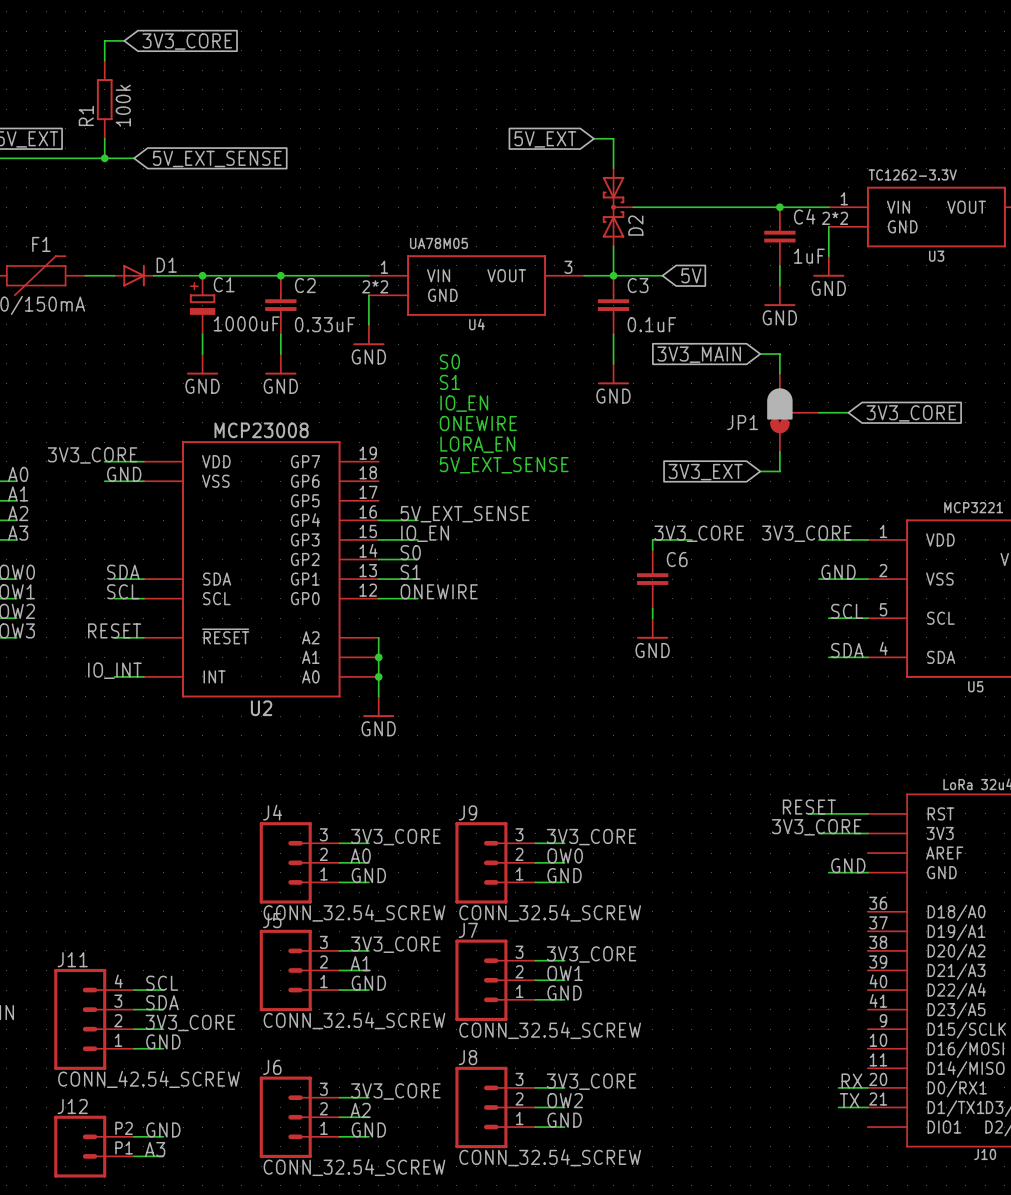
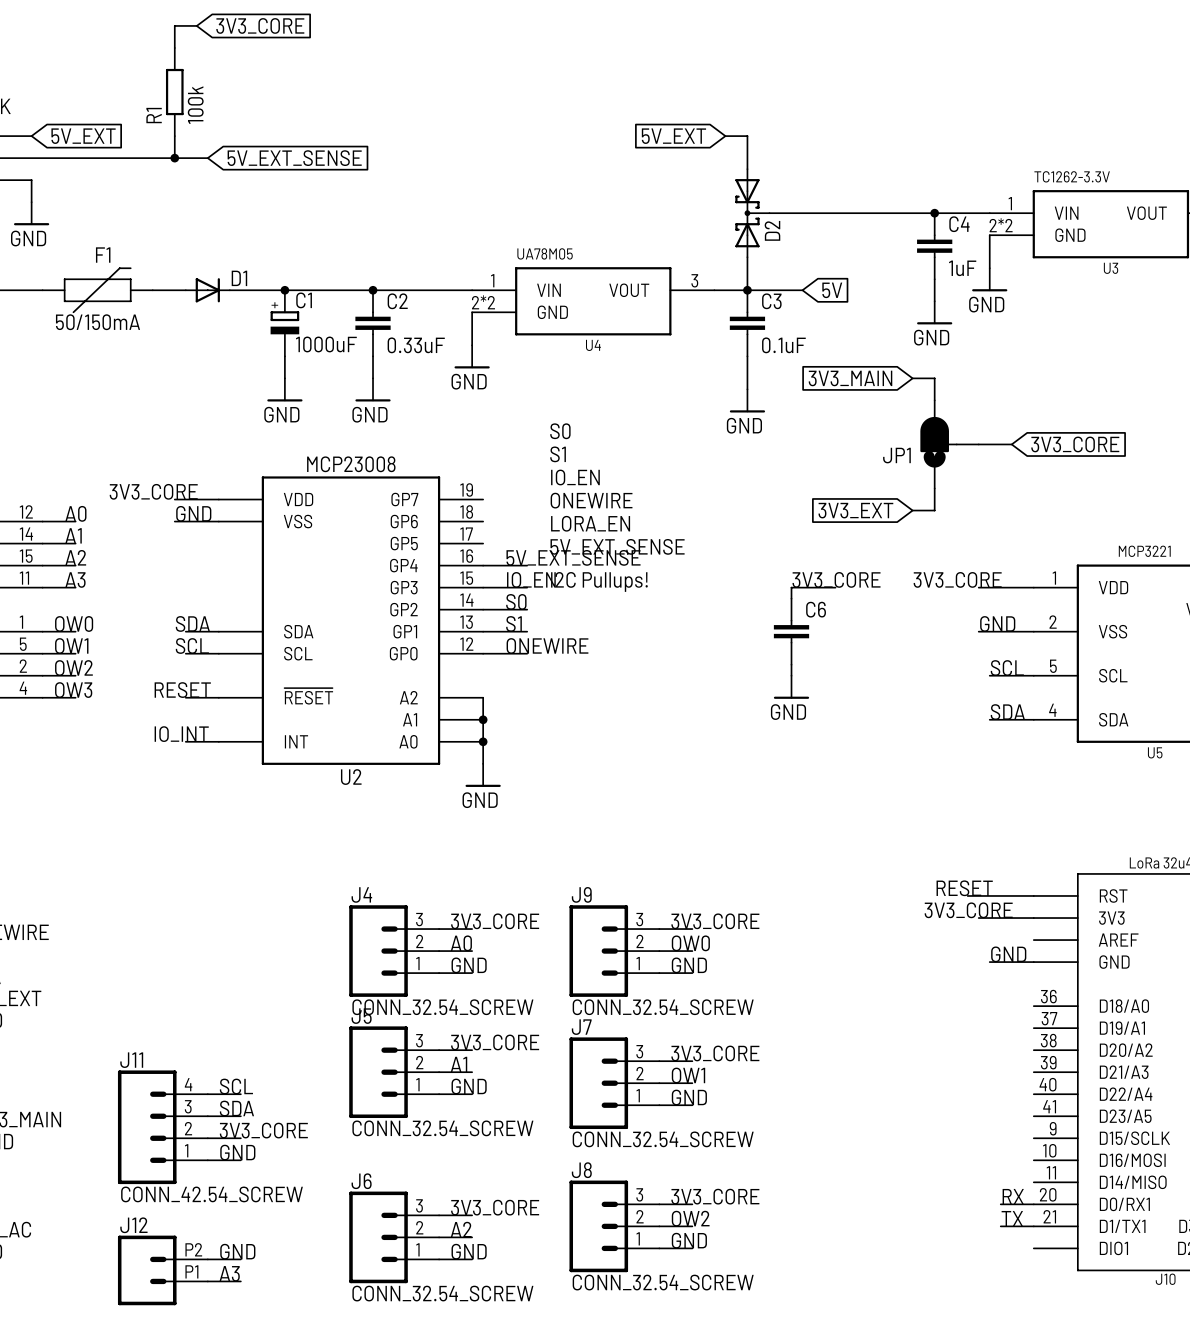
text: S0 (449, 361) -> none
text: S1 (449, 382) -> none
text: IO_EN (464, 403) -> S0 (560, 431)
text: ONEWIRE (478, 423) -> S1 (558, 454)
text: LORA_EN (477, 444) -> IO_EN (575, 477)
text: 5V_EXT_SENSE (504, 465) -> ONEWIRE (591, 500)
text: none -> LORA_EN (590, 523)
text: none -> 5V_EXT_SENSE (617, 546)
text: none -> I2C Pullups! (599, 581)

